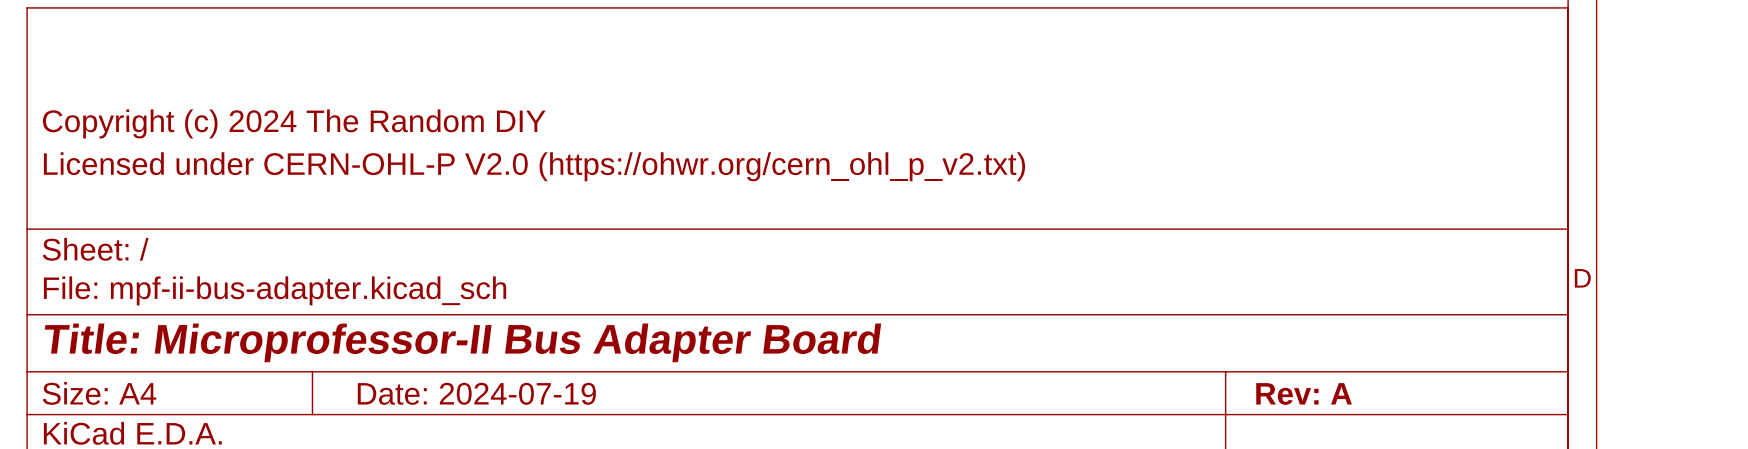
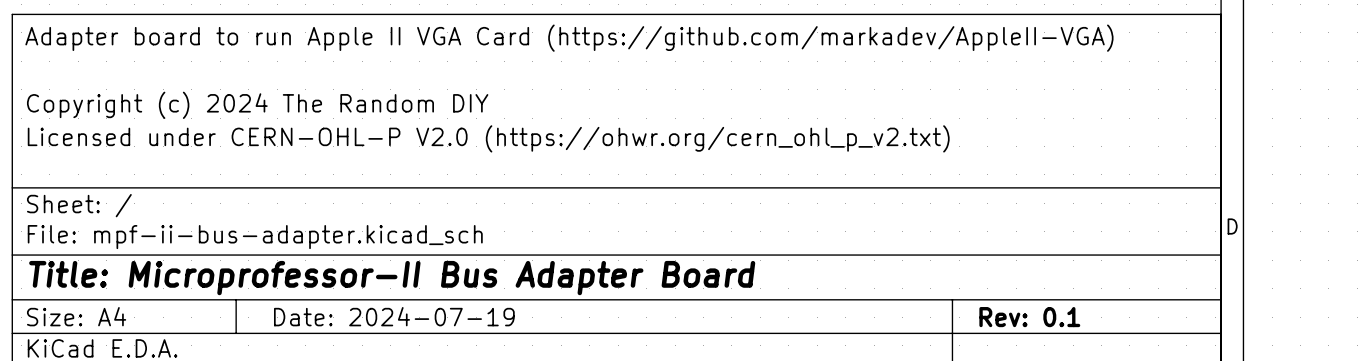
title block: none -> Adapter board to run Apple II VGA Card (https://github.com/markadev/AppleII-VGA) (569, 38)
title block: Rev: A (1304, 393) -> Rev: 0.1 (1029, 317)

